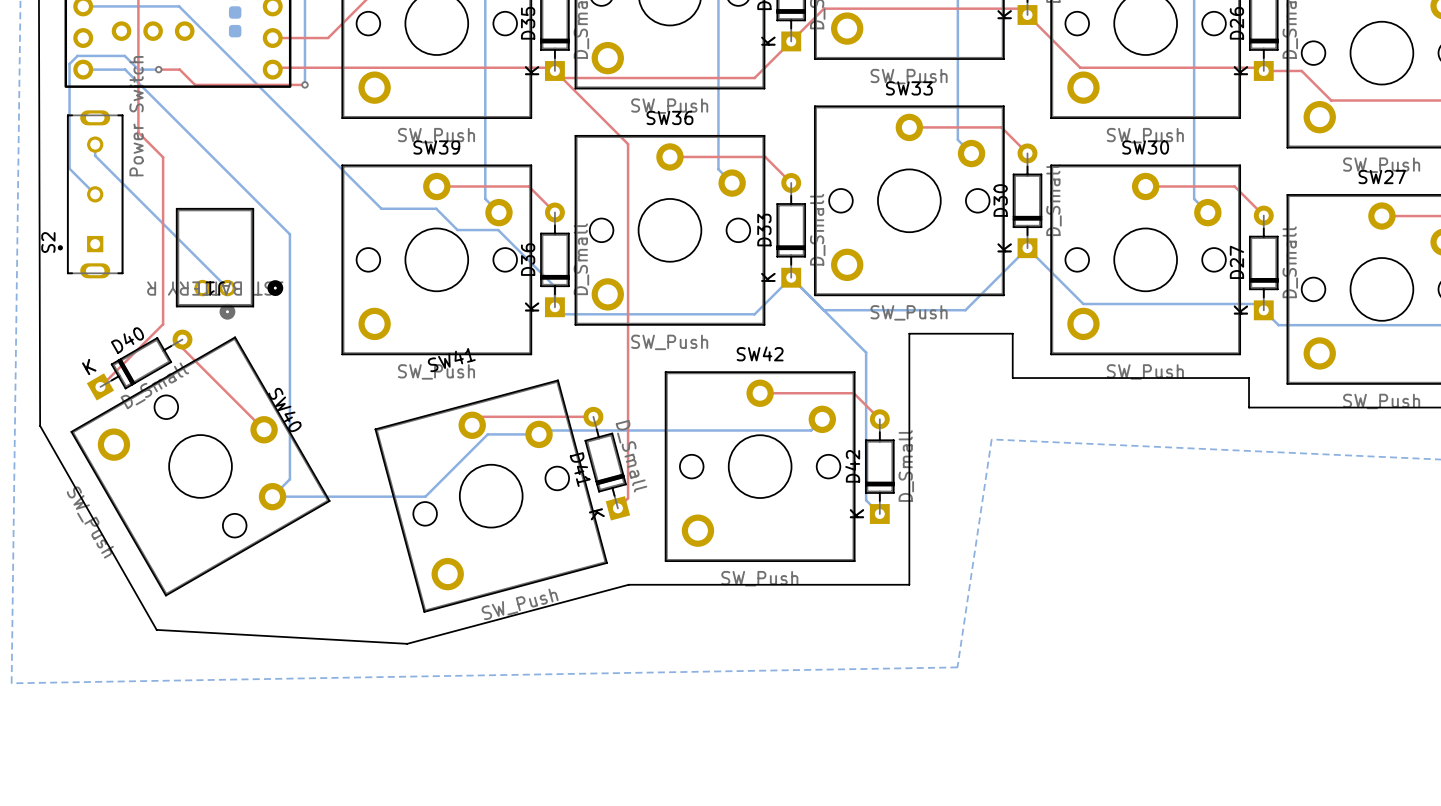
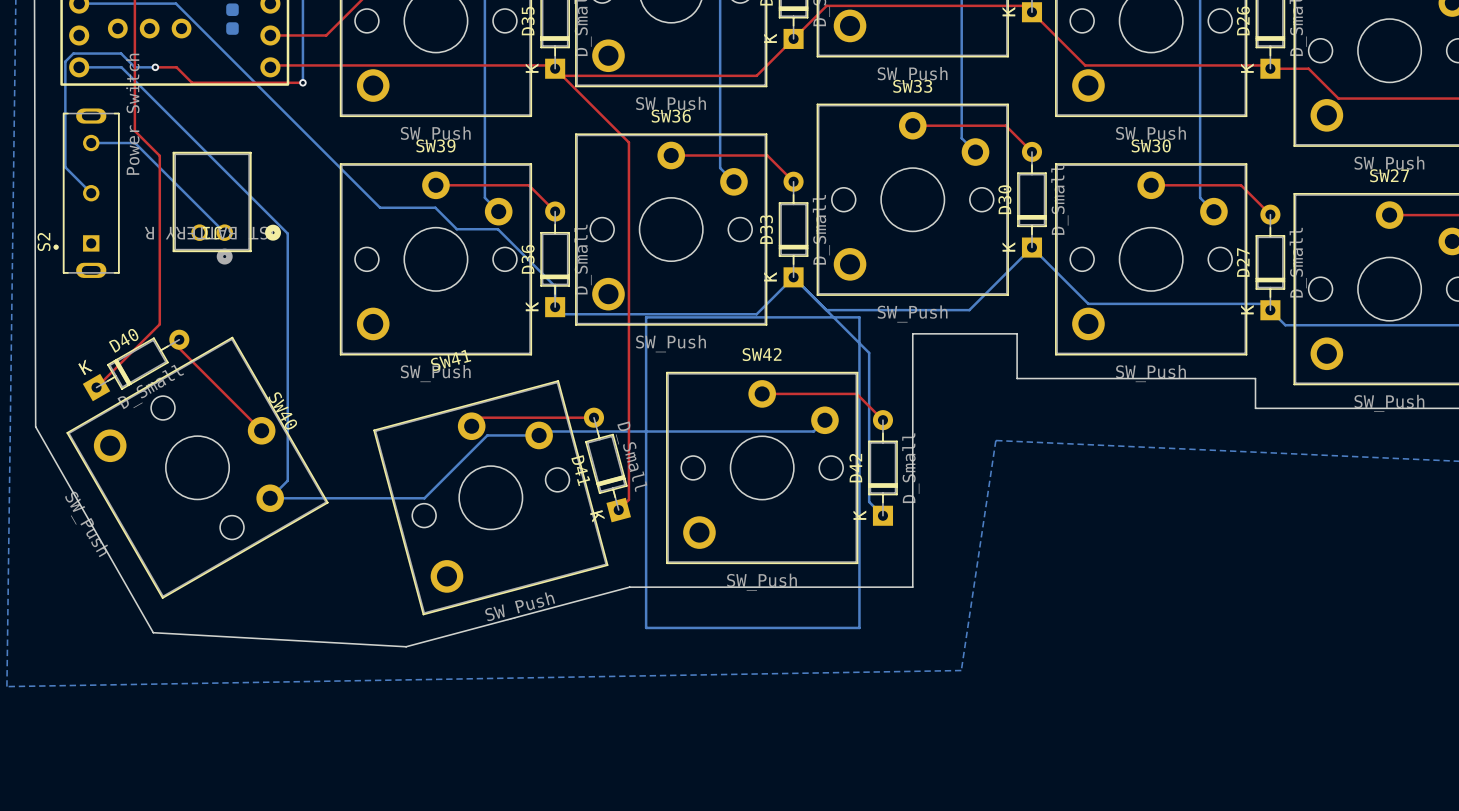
bottom track: (95, 144) (95, 155) (227, 288) -> (91, 143) (135, 143) (224, 232)
J1 position: (229, 263) -> (226, 208)
bottom track: none -> (646, 317) (859, 317) (859, 627) (646, 627) (646, 317)

